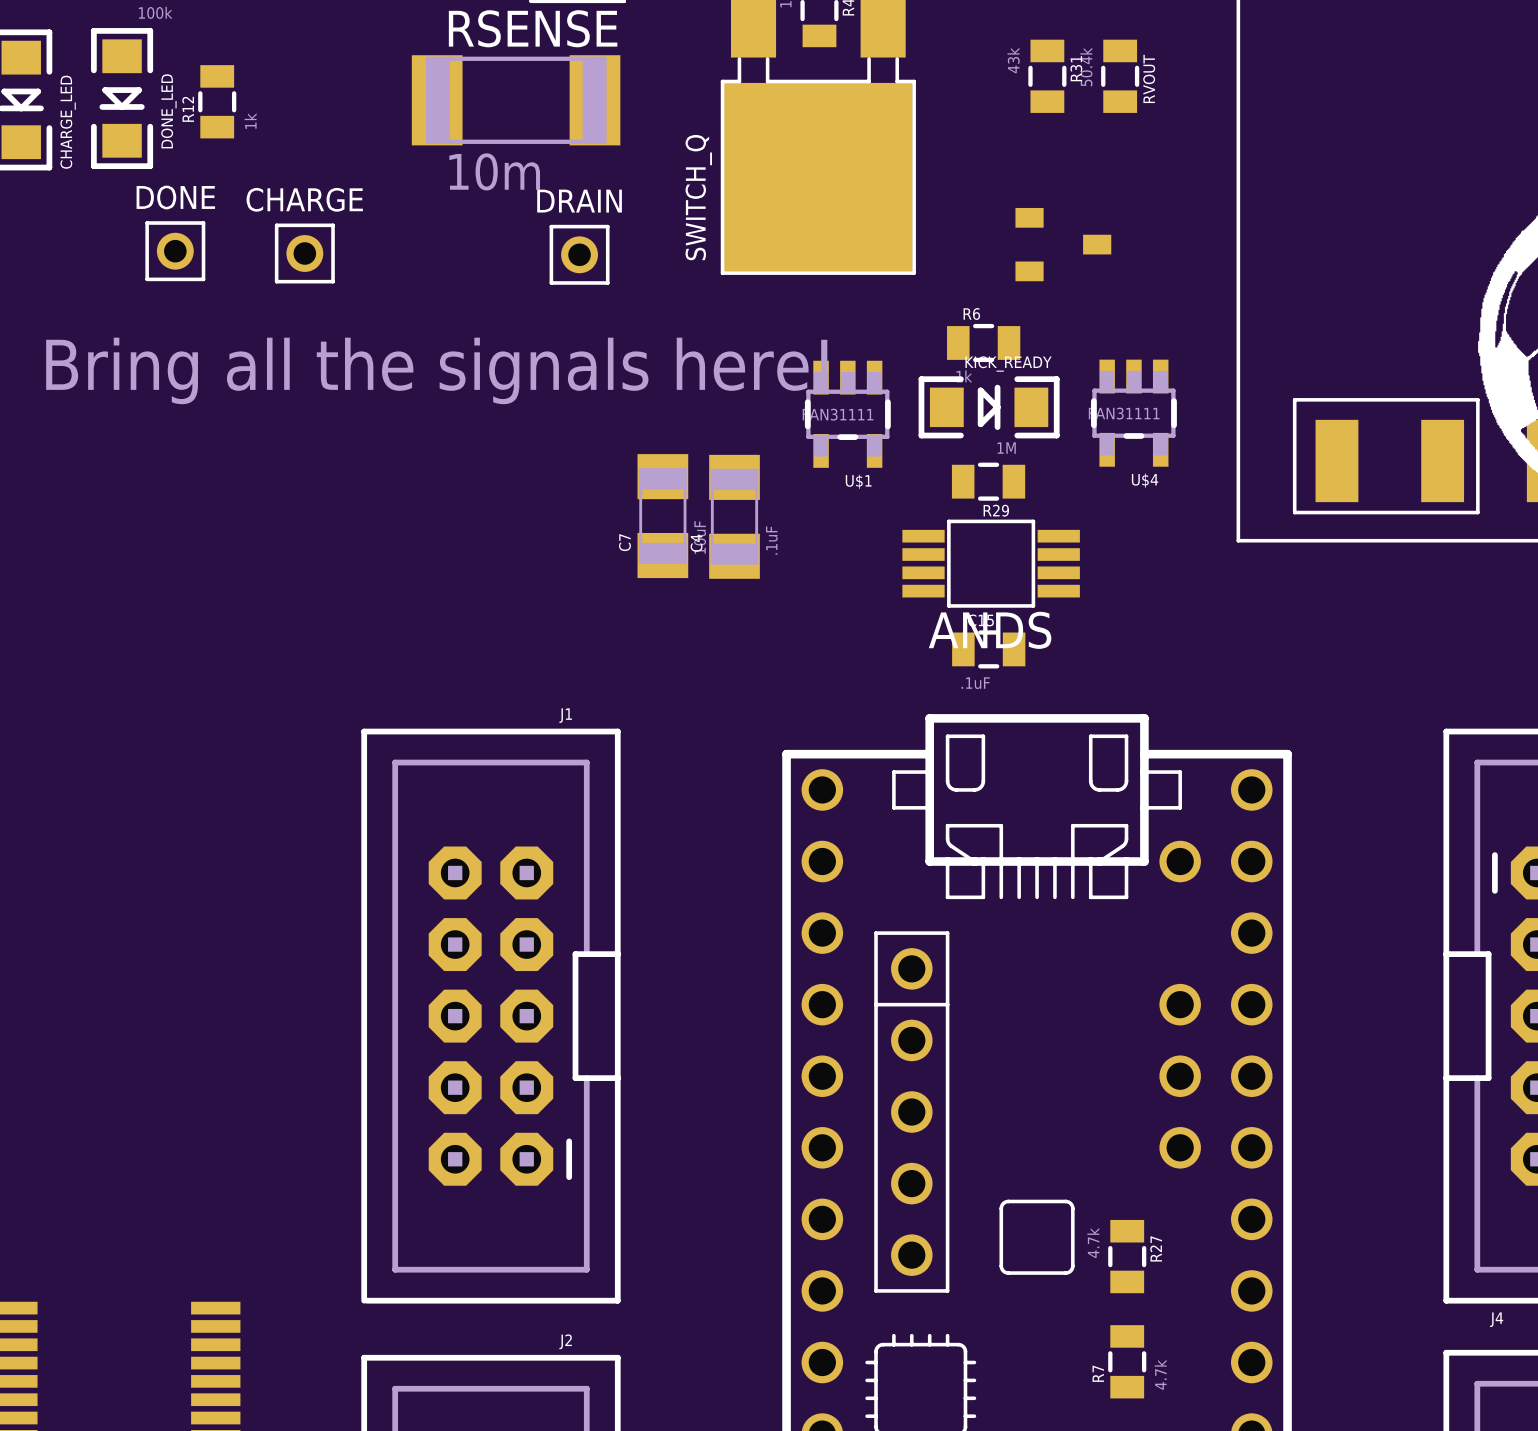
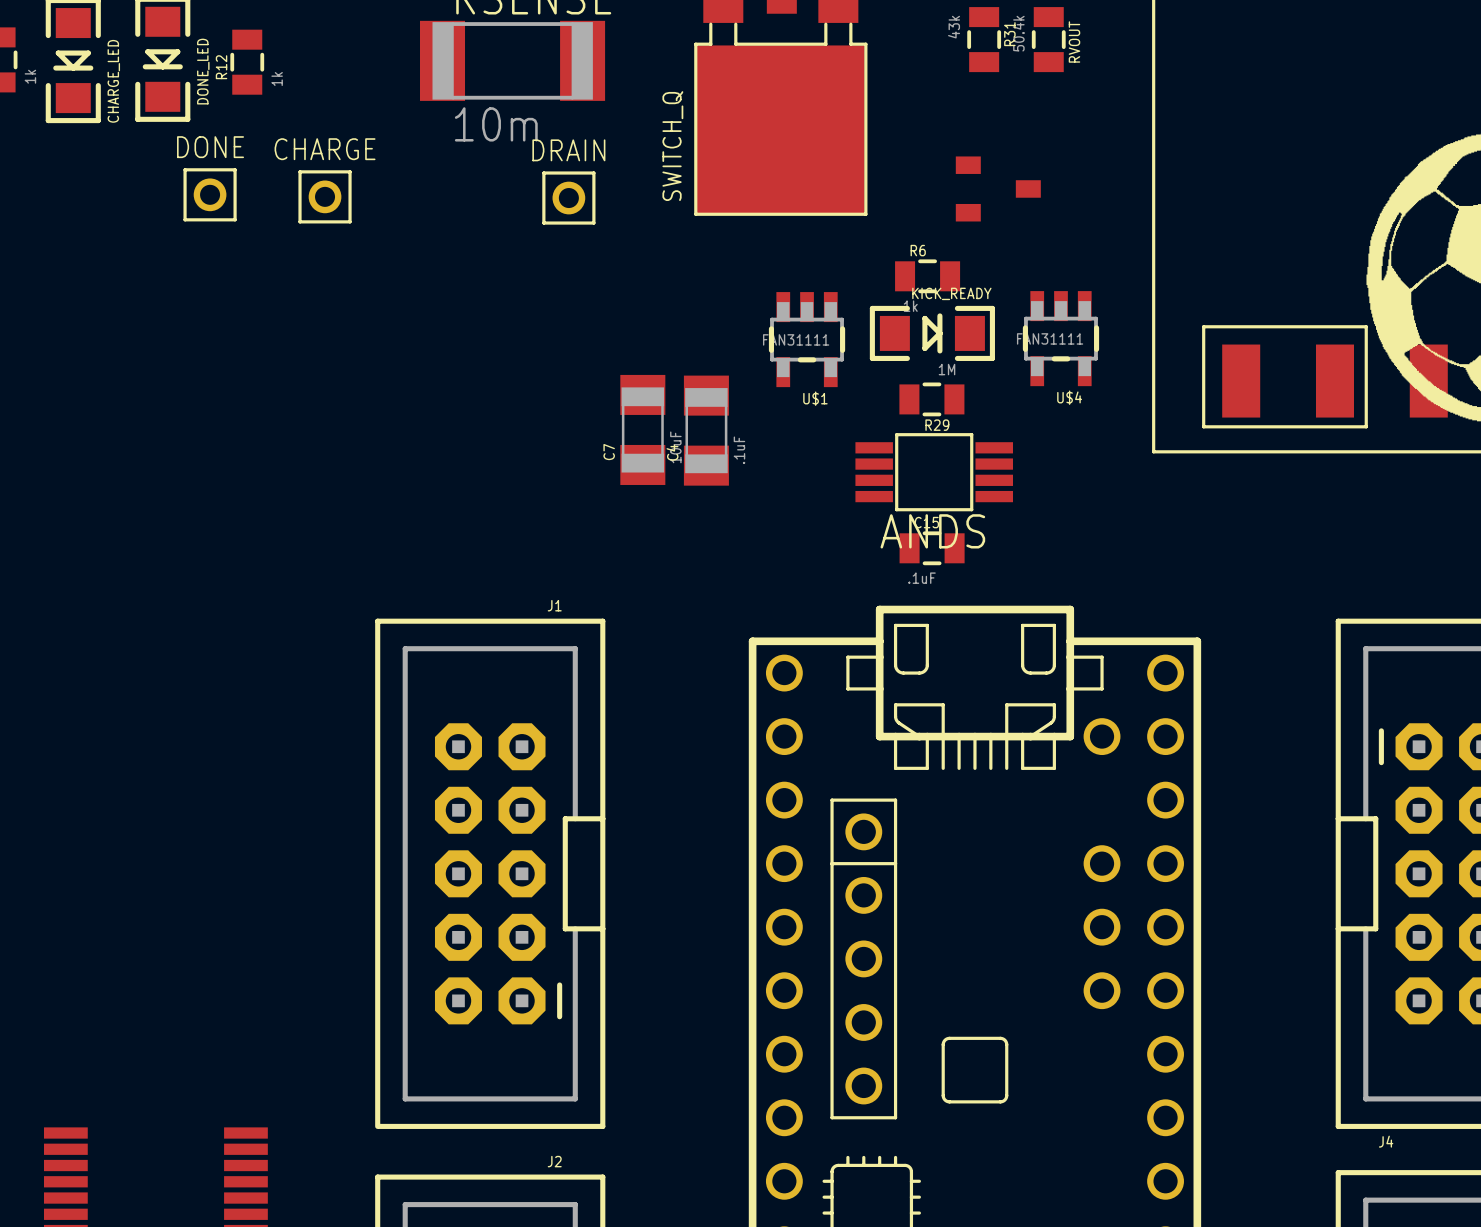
text: Bring all the signals here! (436, 370) -> none
R27: 4.7k (1127, 1256) -> none
R7: 4.7k (1127, 1361) -> none

